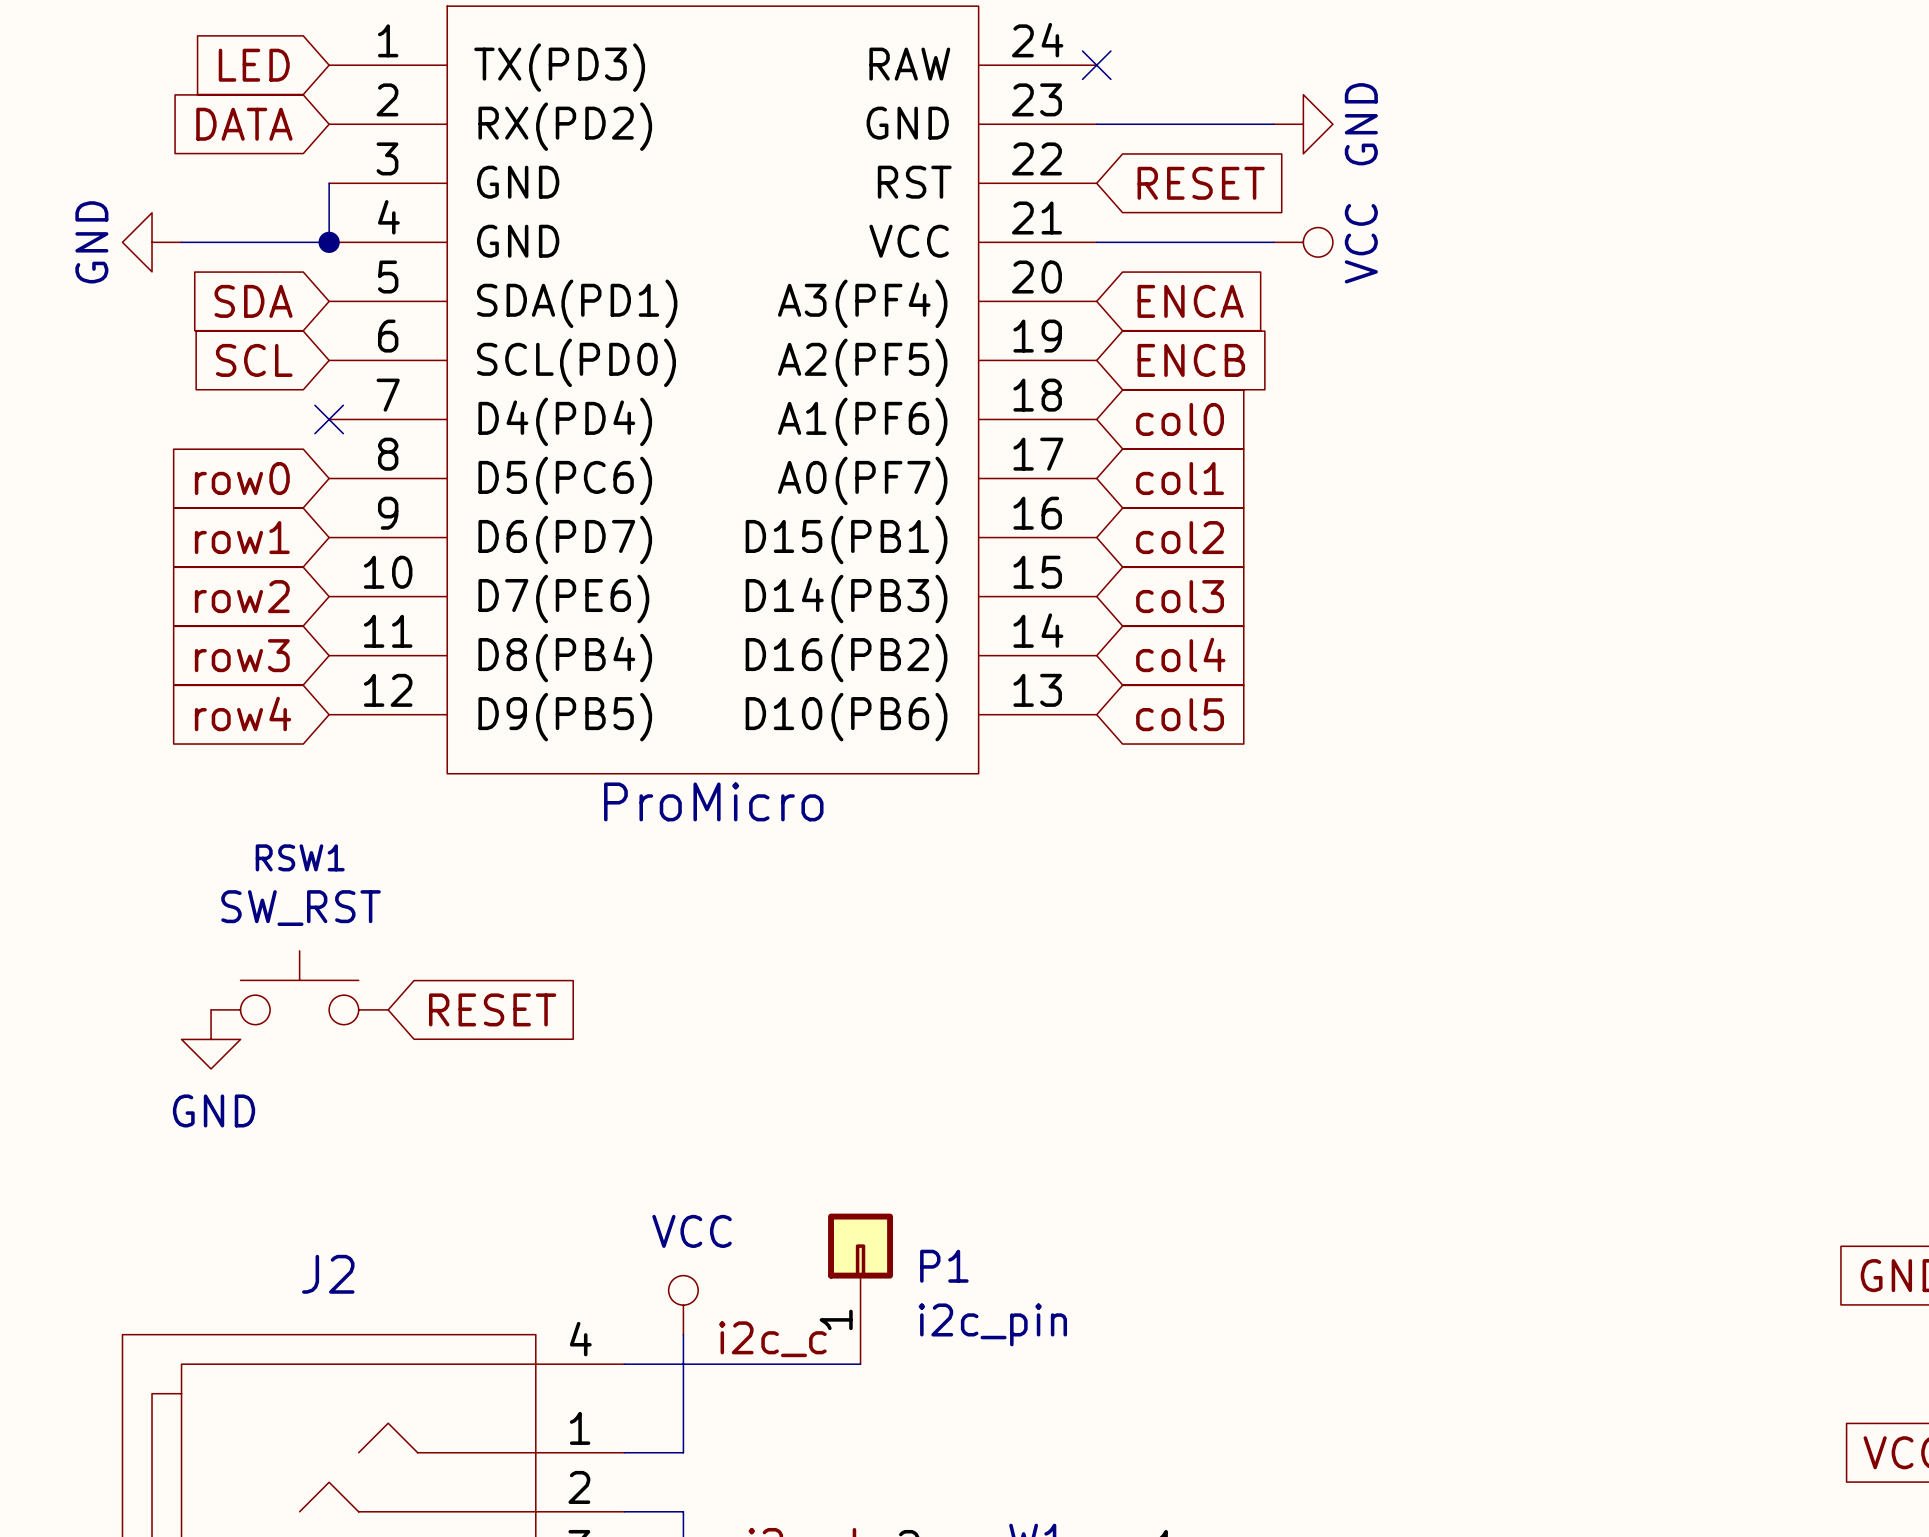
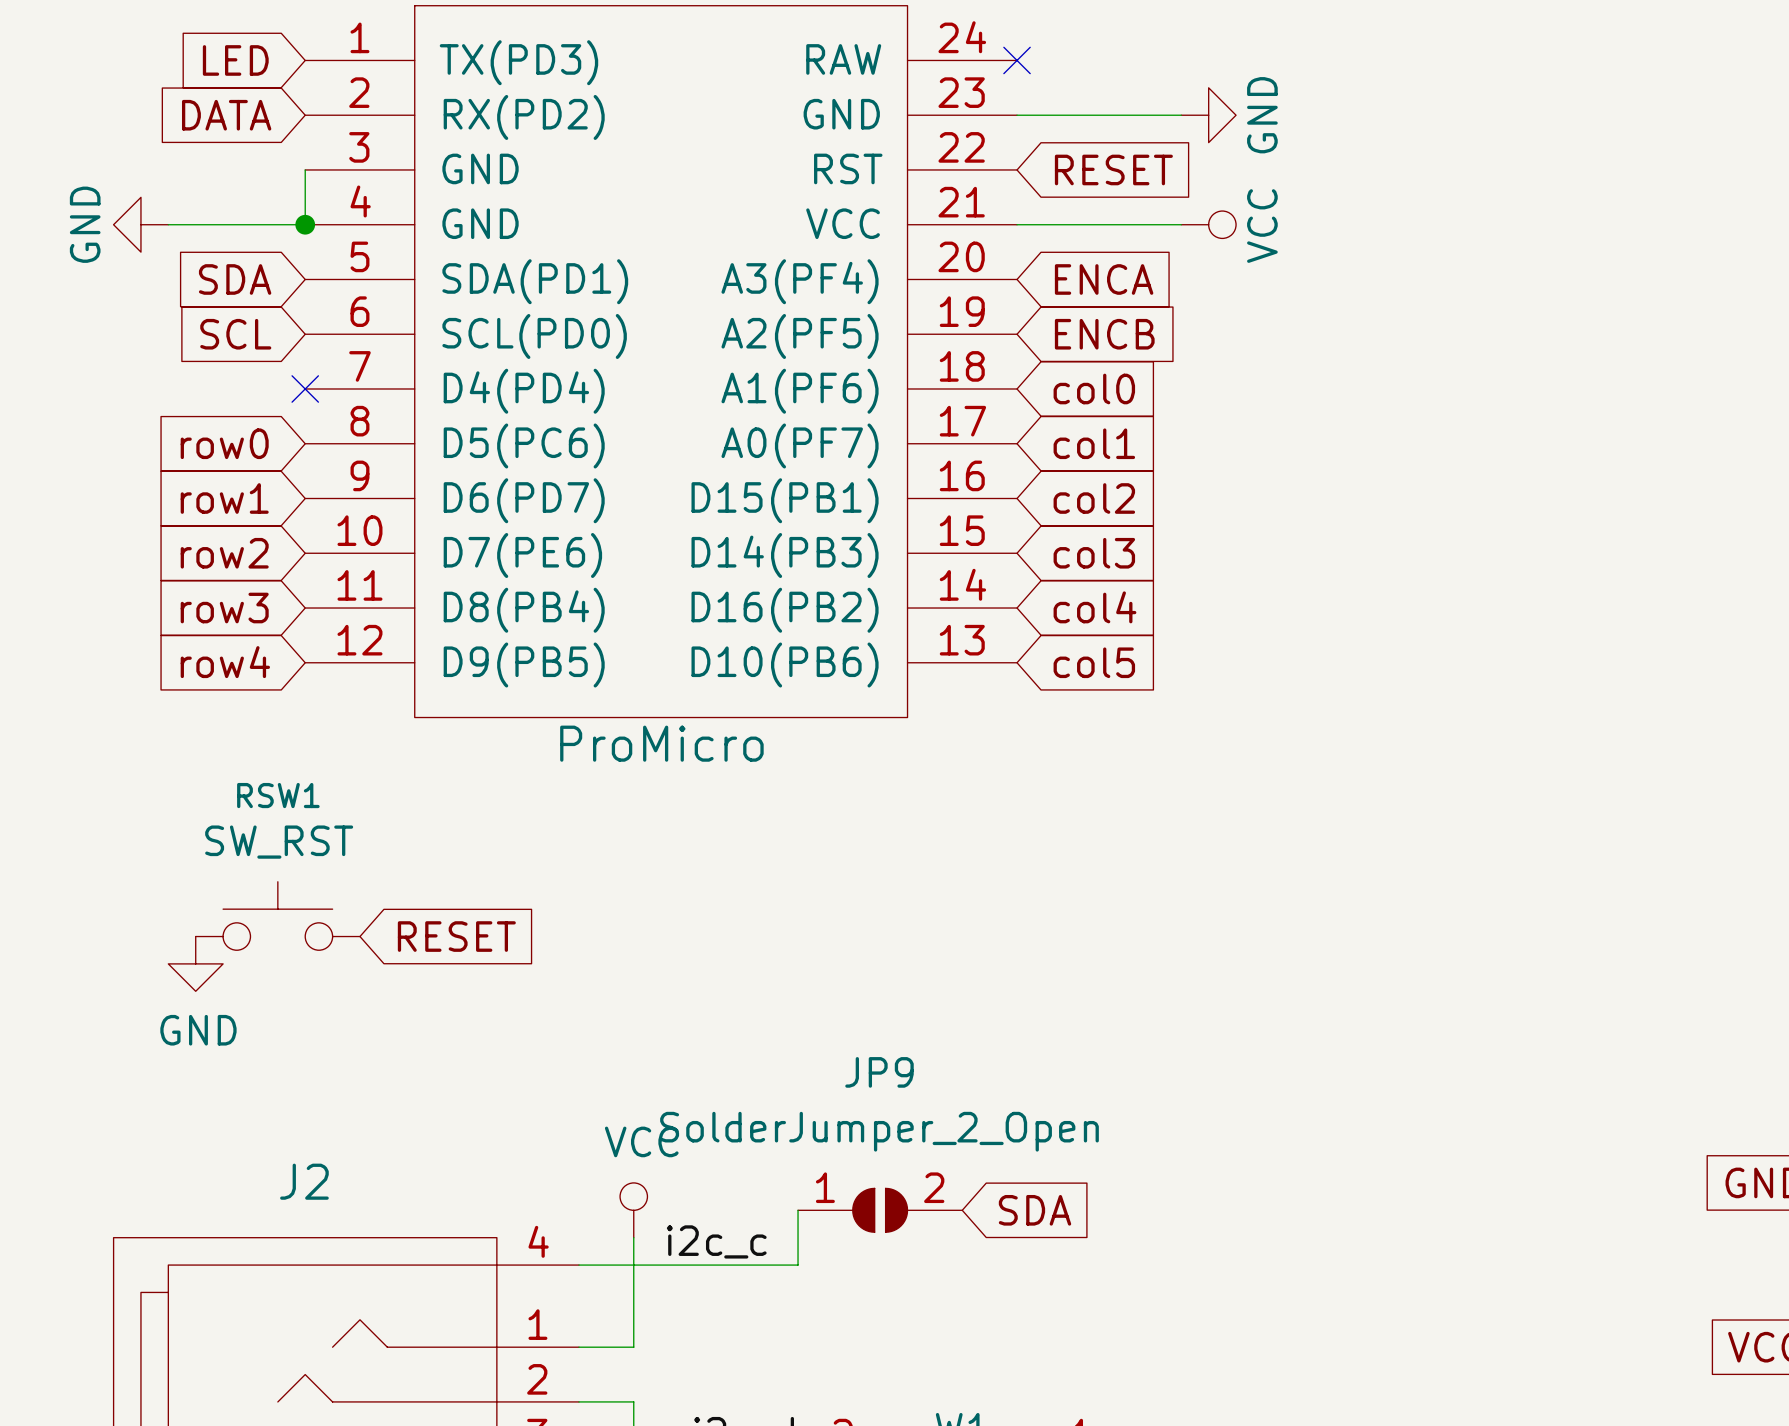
P1: i2c_pin (860, 1288) -> none
JP9: none -> SolderJumper_2_Open (880, 1210)
global label: none -> SDA (1035, 1210)

